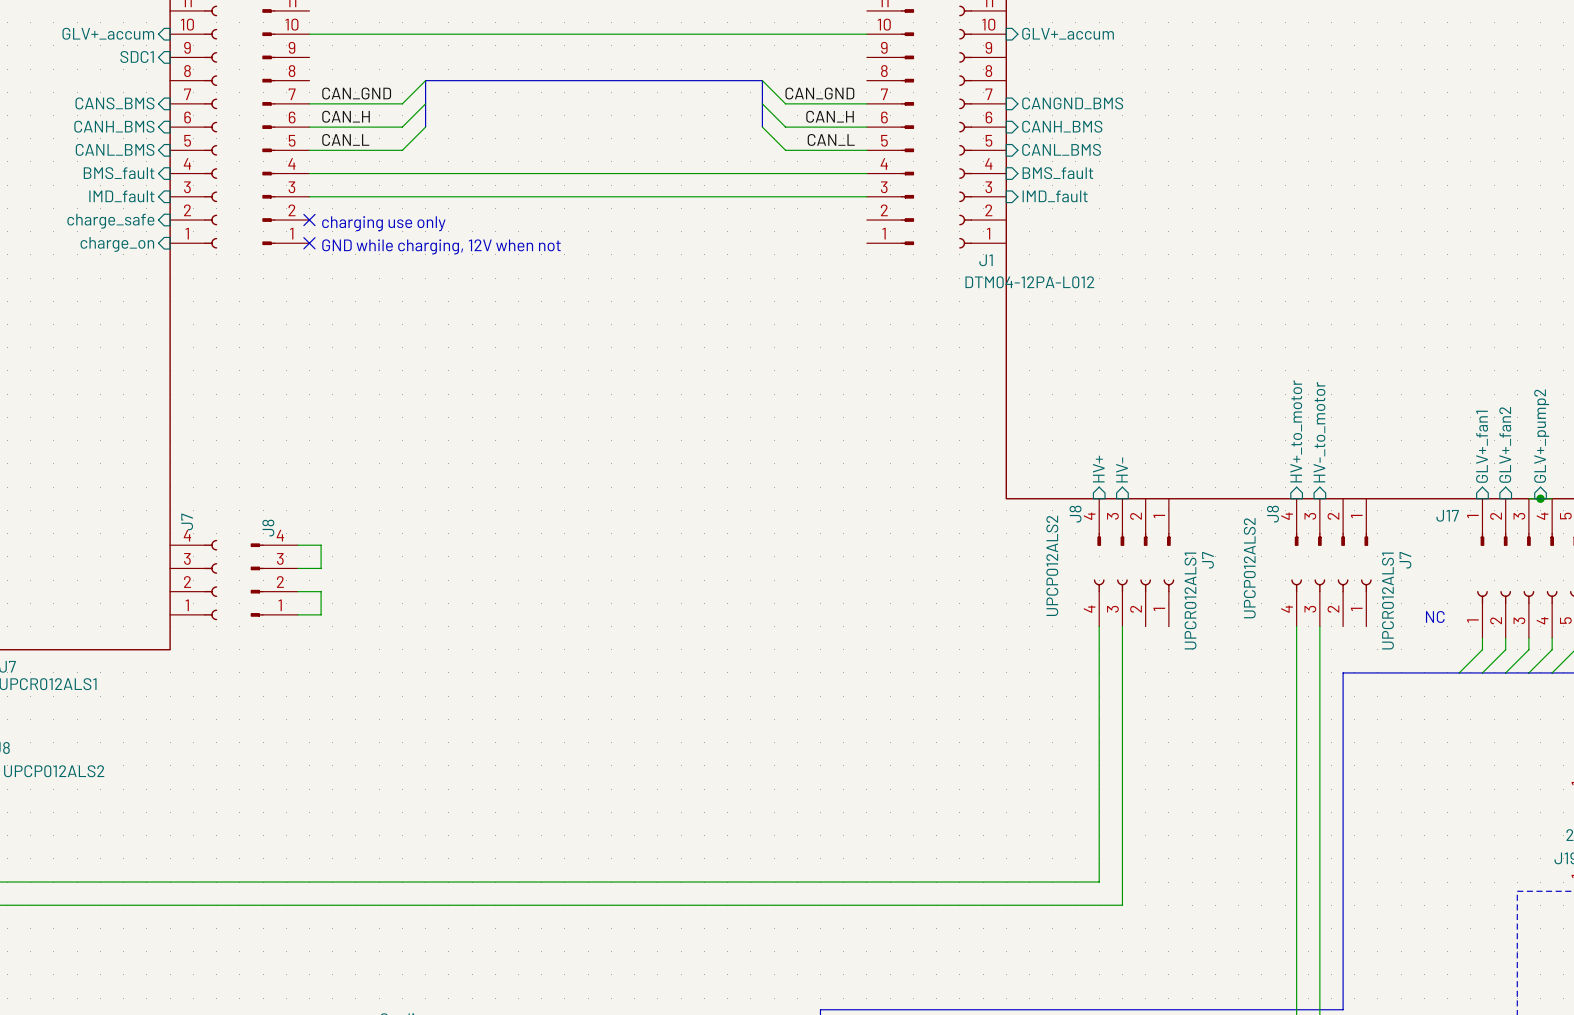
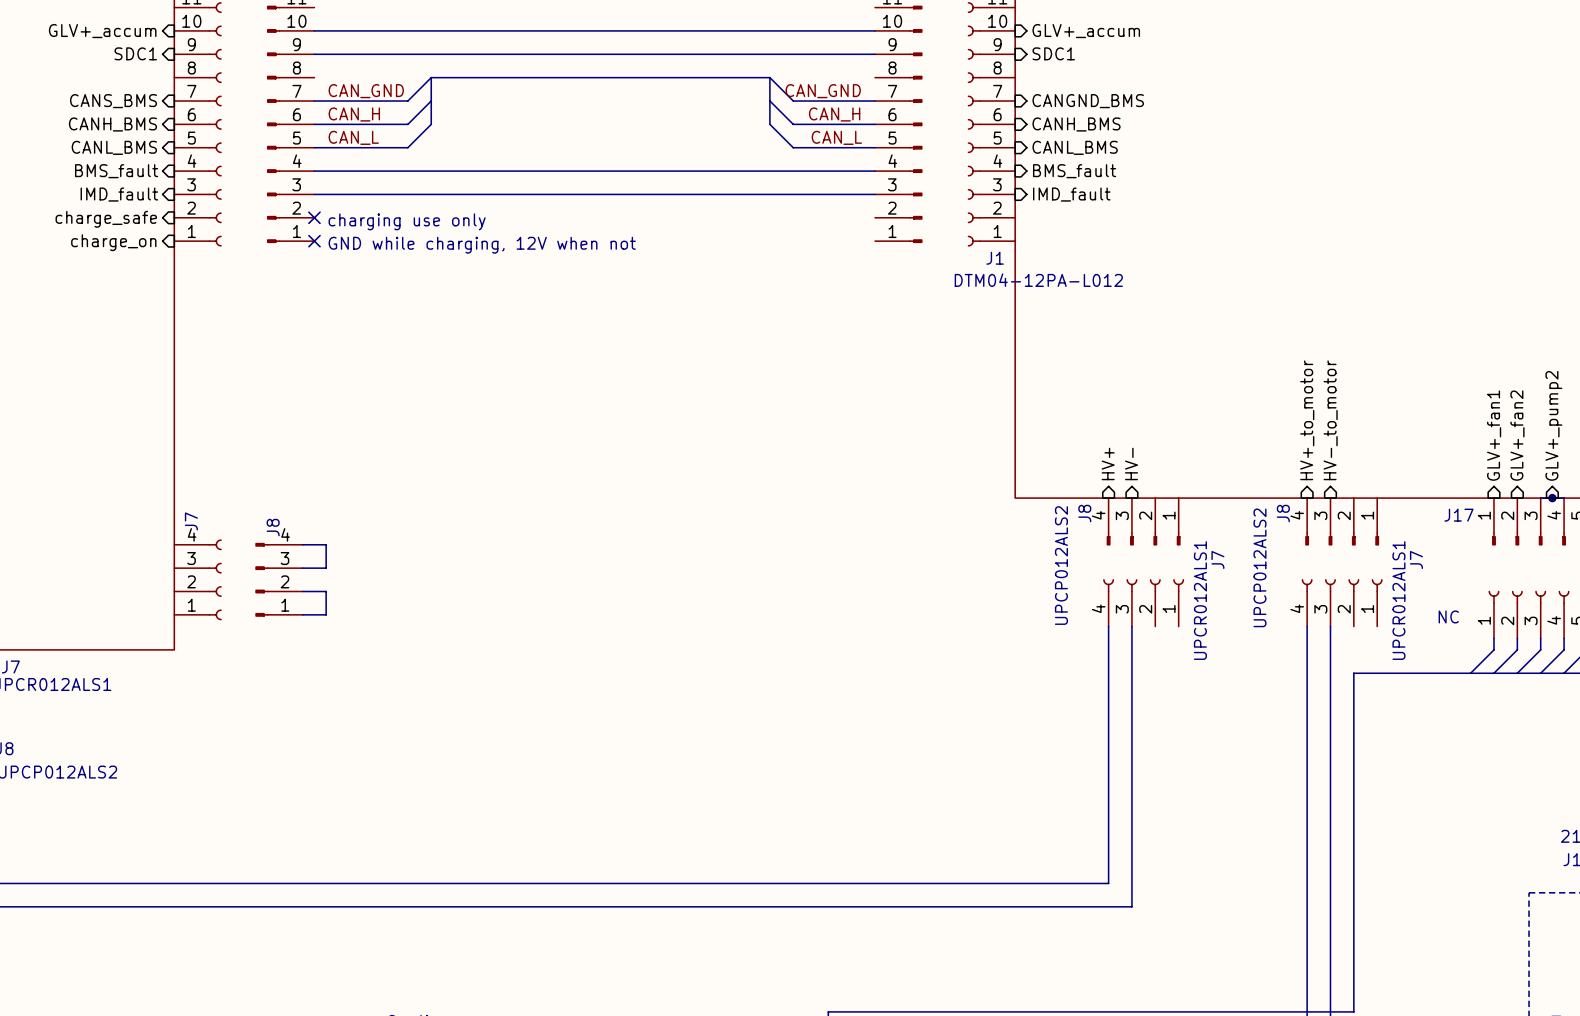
sheet pin: none -> SDC1 (1053, 53)
wire: none -> (314, 54) (875, 54)

